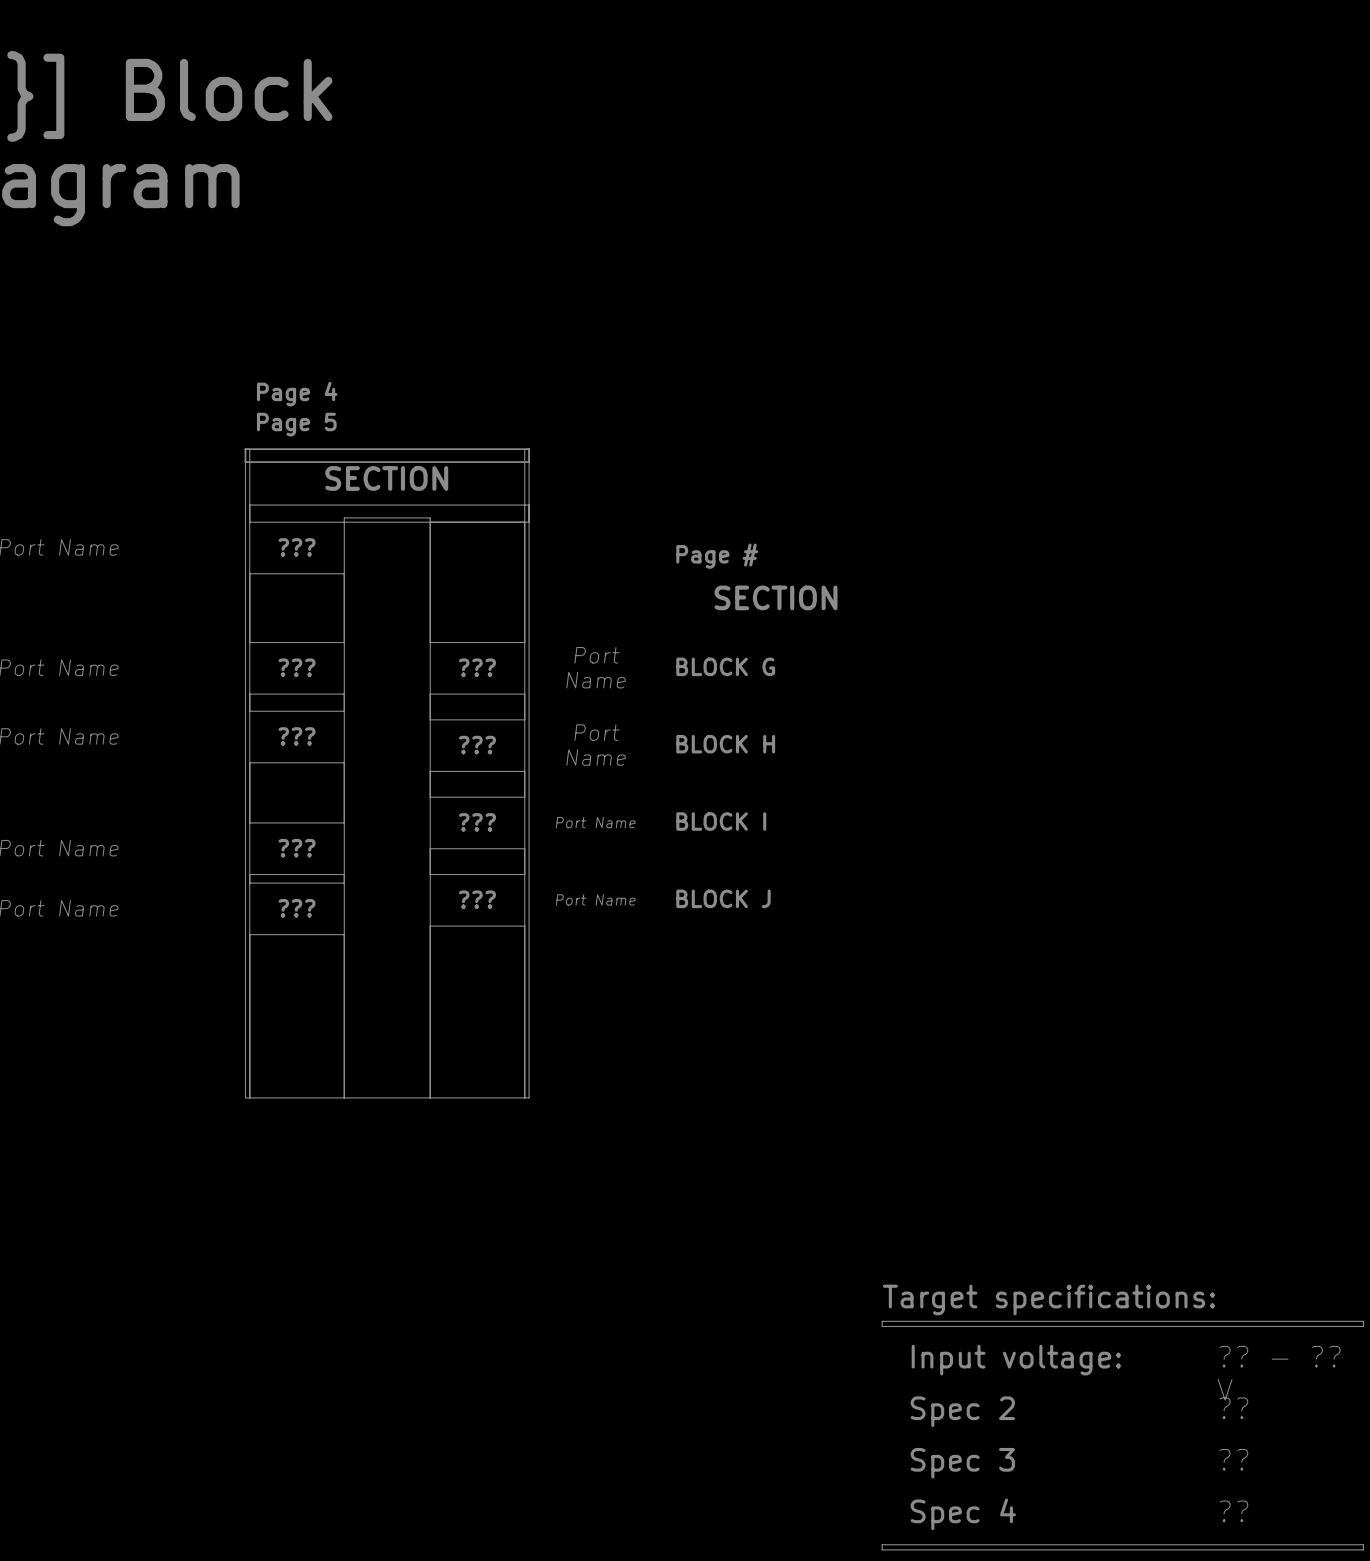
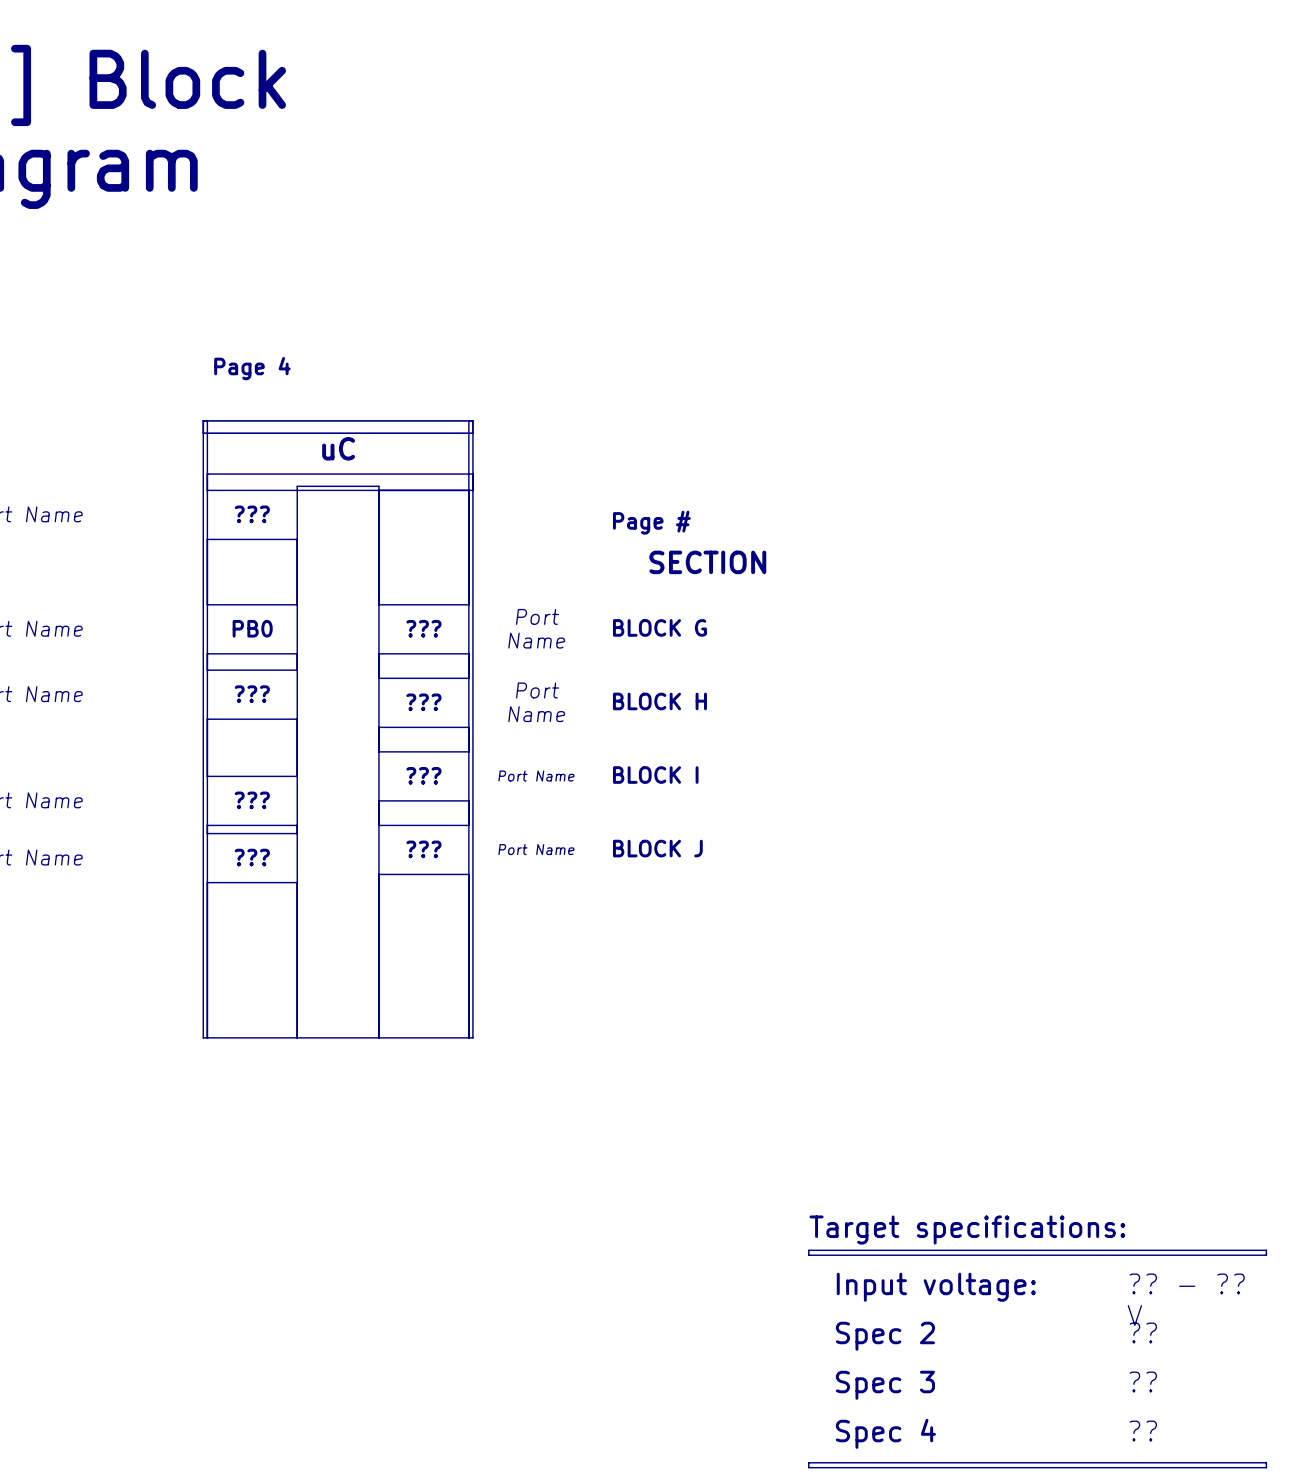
text: Page 5 (296, 424) -> none
text: SECTION (386, 478) -> uC (338, 448)
text: ??? (297, 667) -> PB0 (252, 628)

